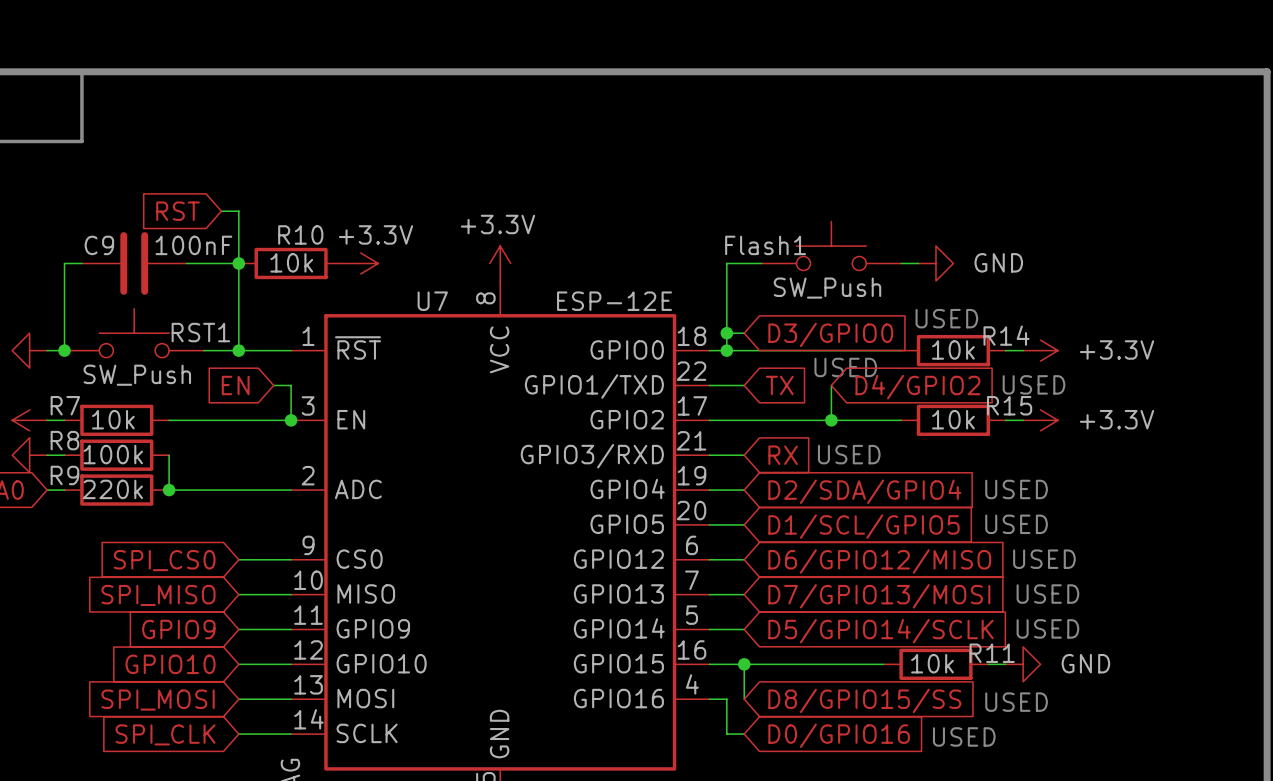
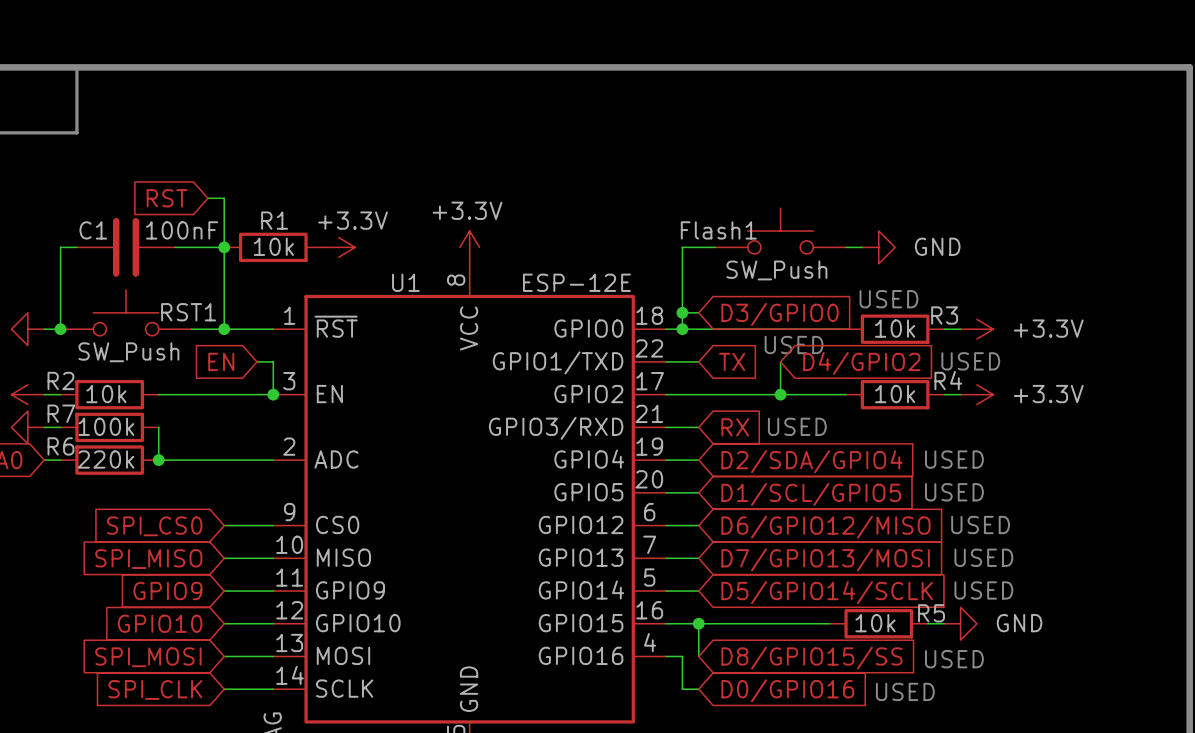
R10 name: R10 (300, 234) -> R1 (274, 220)
C9 name: C9 (99, 245) -> C1 (93, 230)
U7 name: U7 (432, 301) -> U1 (405, 282)
R14 name: R14 (1006, 335) -> R3 (944, 315)
R7 name: R7 (65, 405) -> R2 (60, 380)
R15 name: R15 (1009, 405) -> R4 (948, 380)
R8 name: R8 (64, 440) -> R7 (61, 413)
R9 name: R9 (64, 475) -> R6 (60, 446)
R11 name: R11 (992, 653) -> R5 (931, 613)

